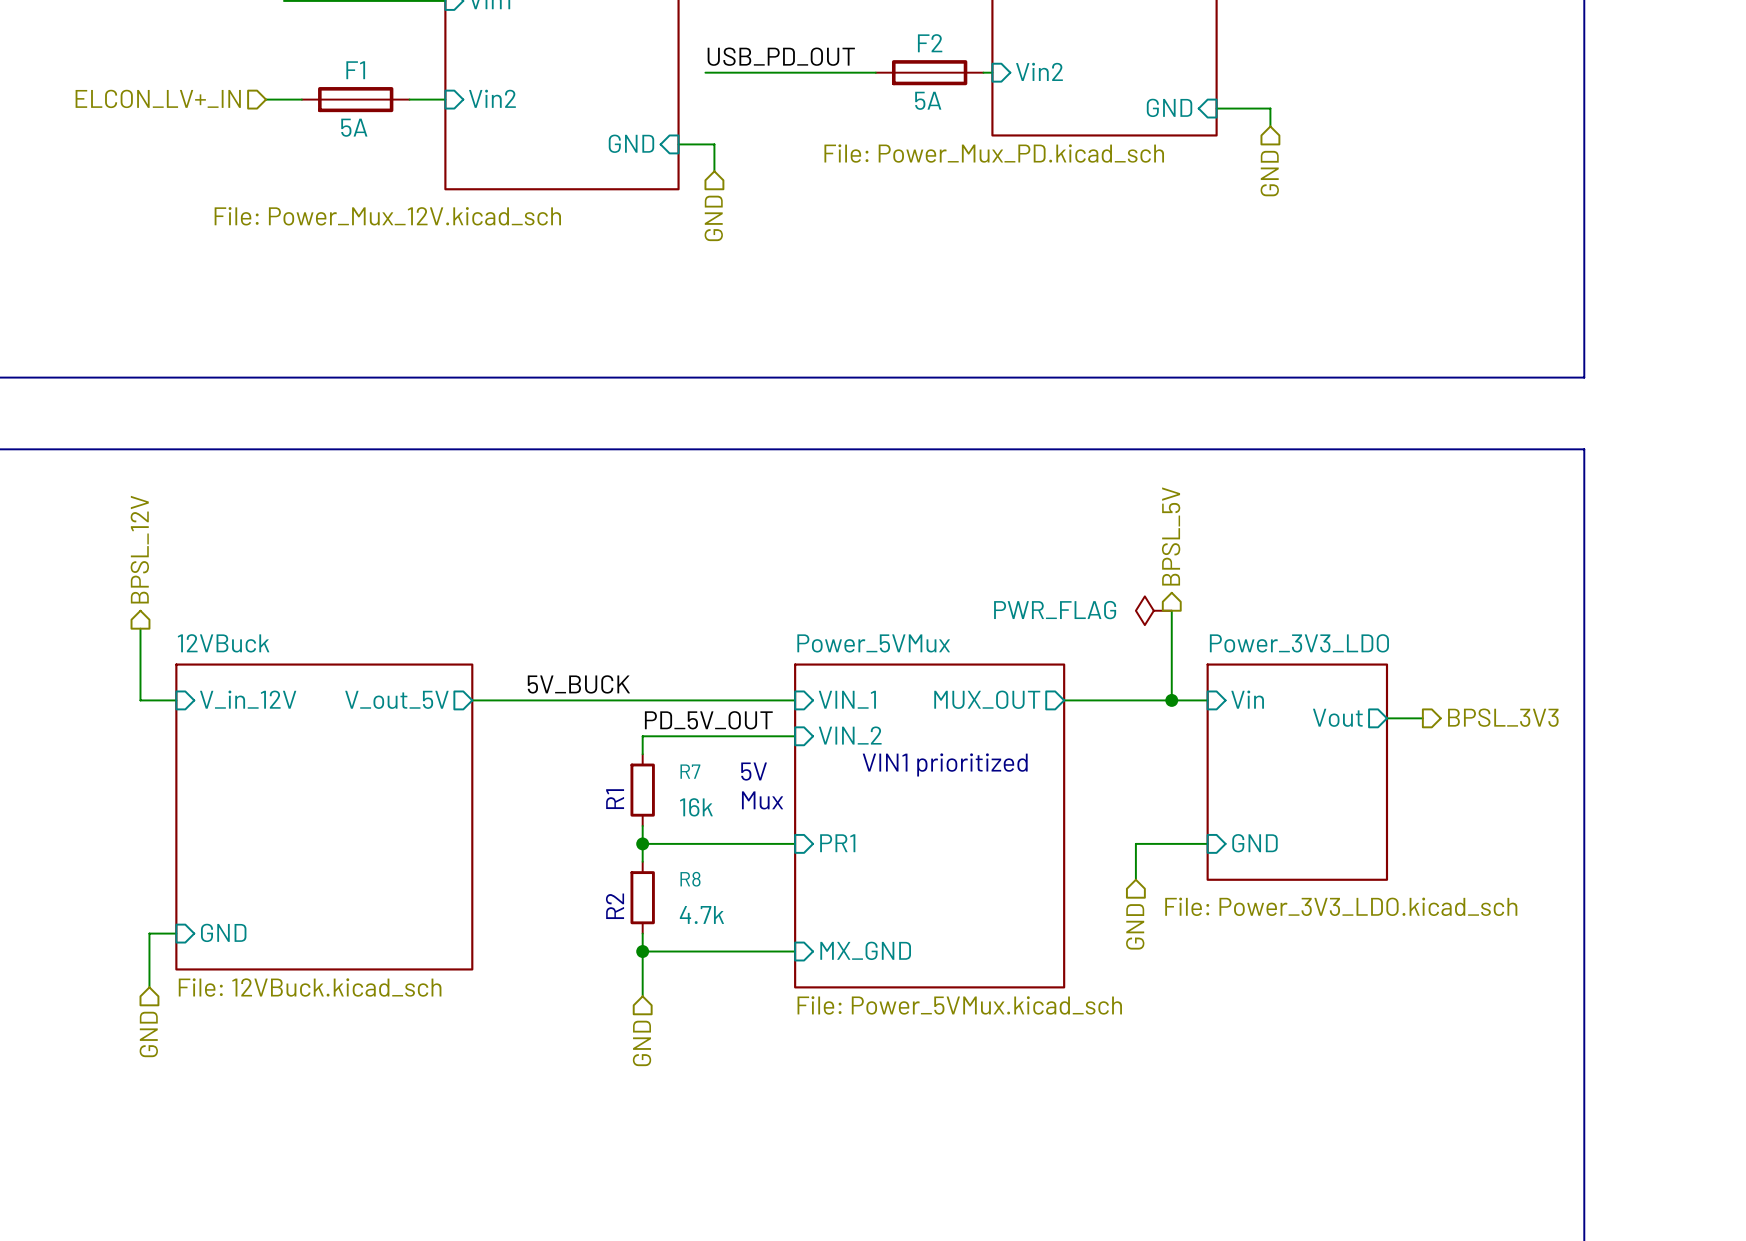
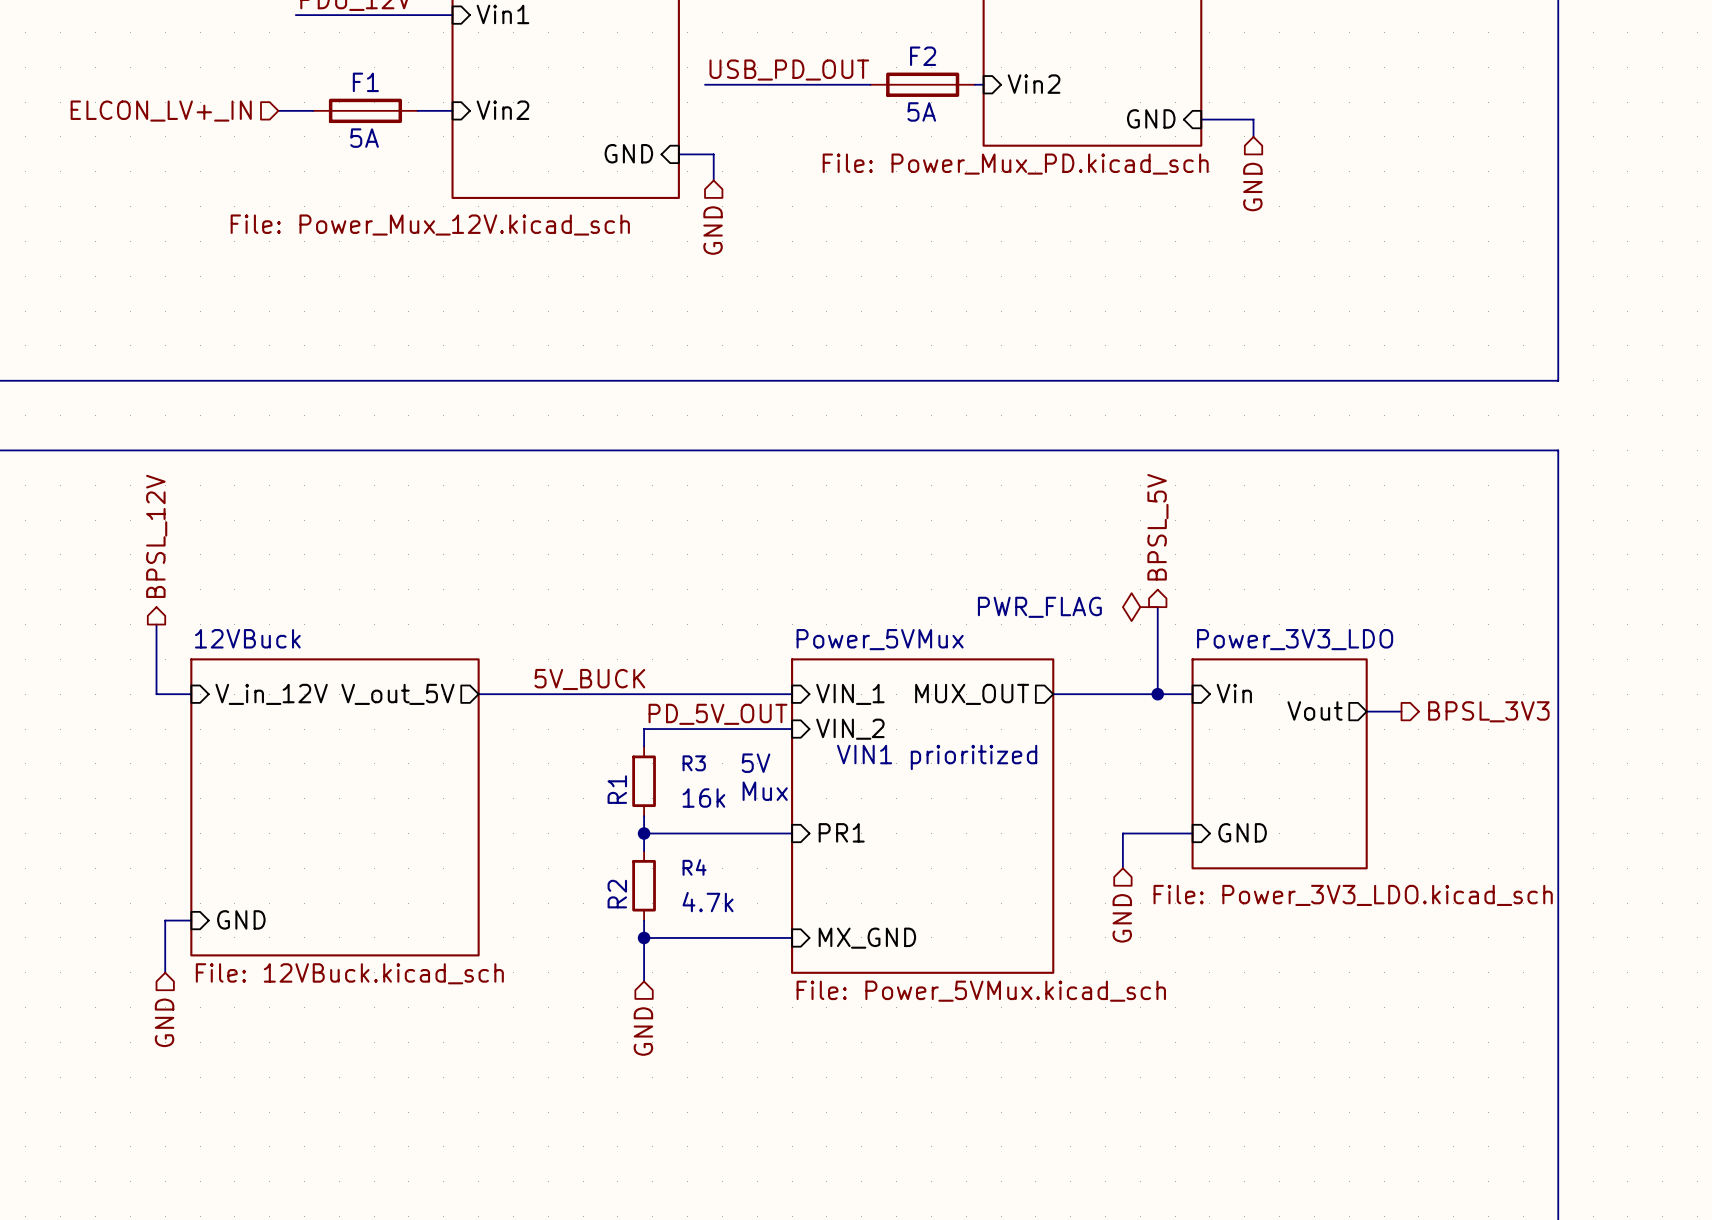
R7 name: R7 (690, 771) -> R3 (694, 763)
R8 name: R8 (690, 879) -> R4 (694, 867)

